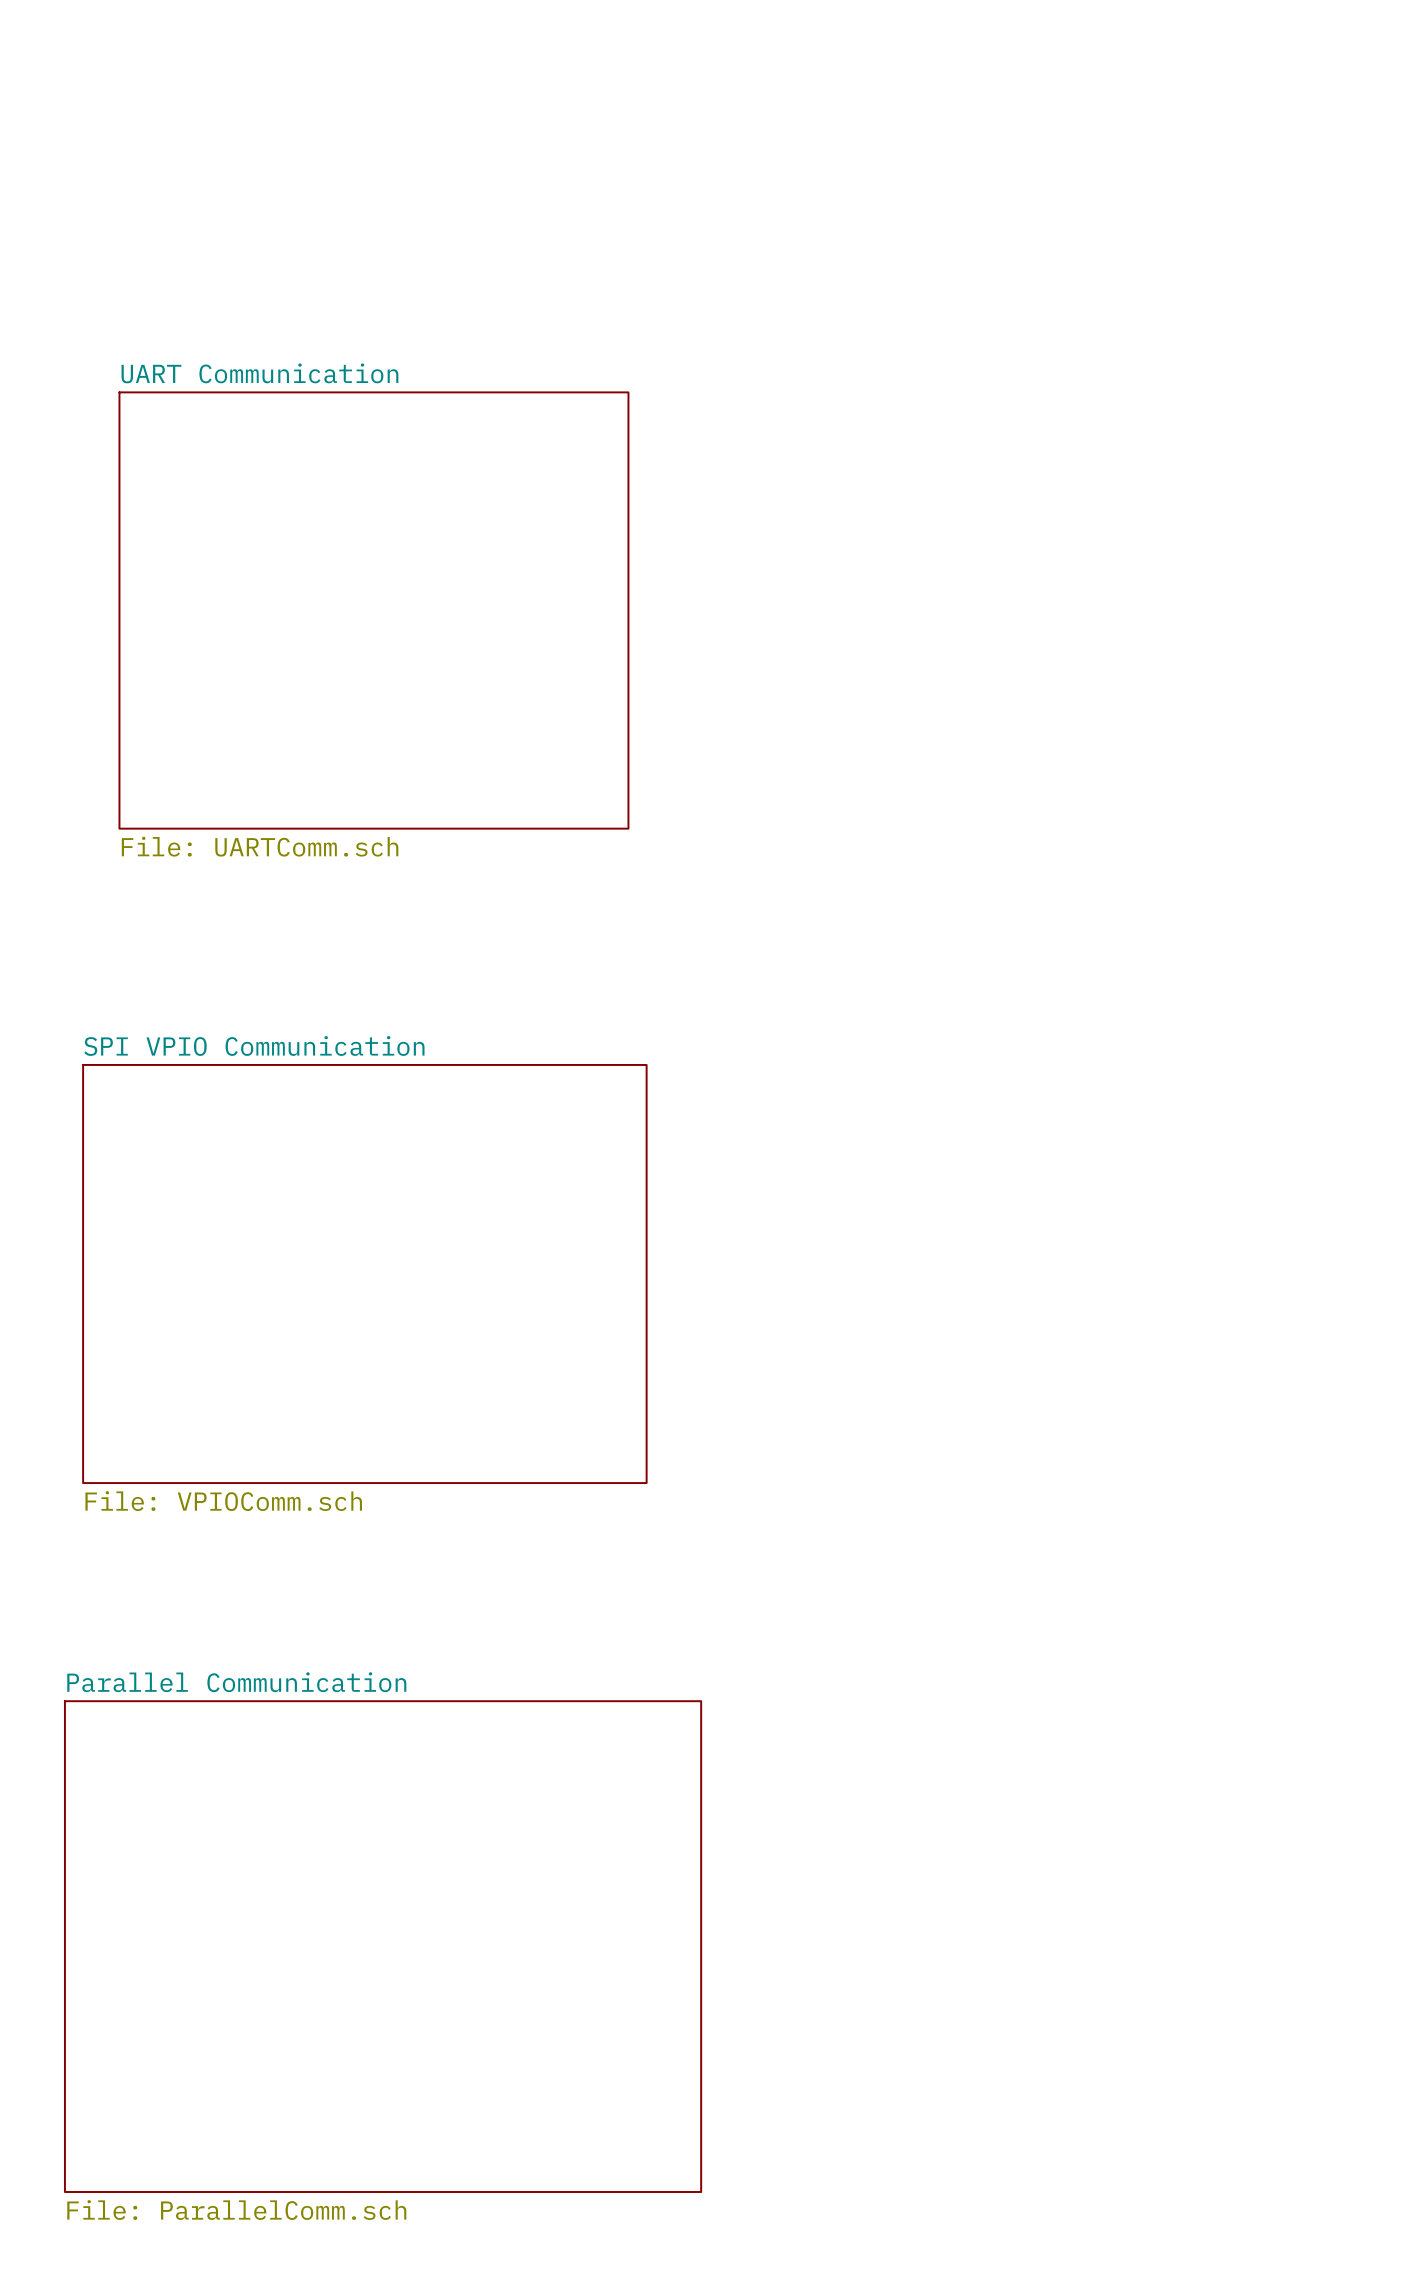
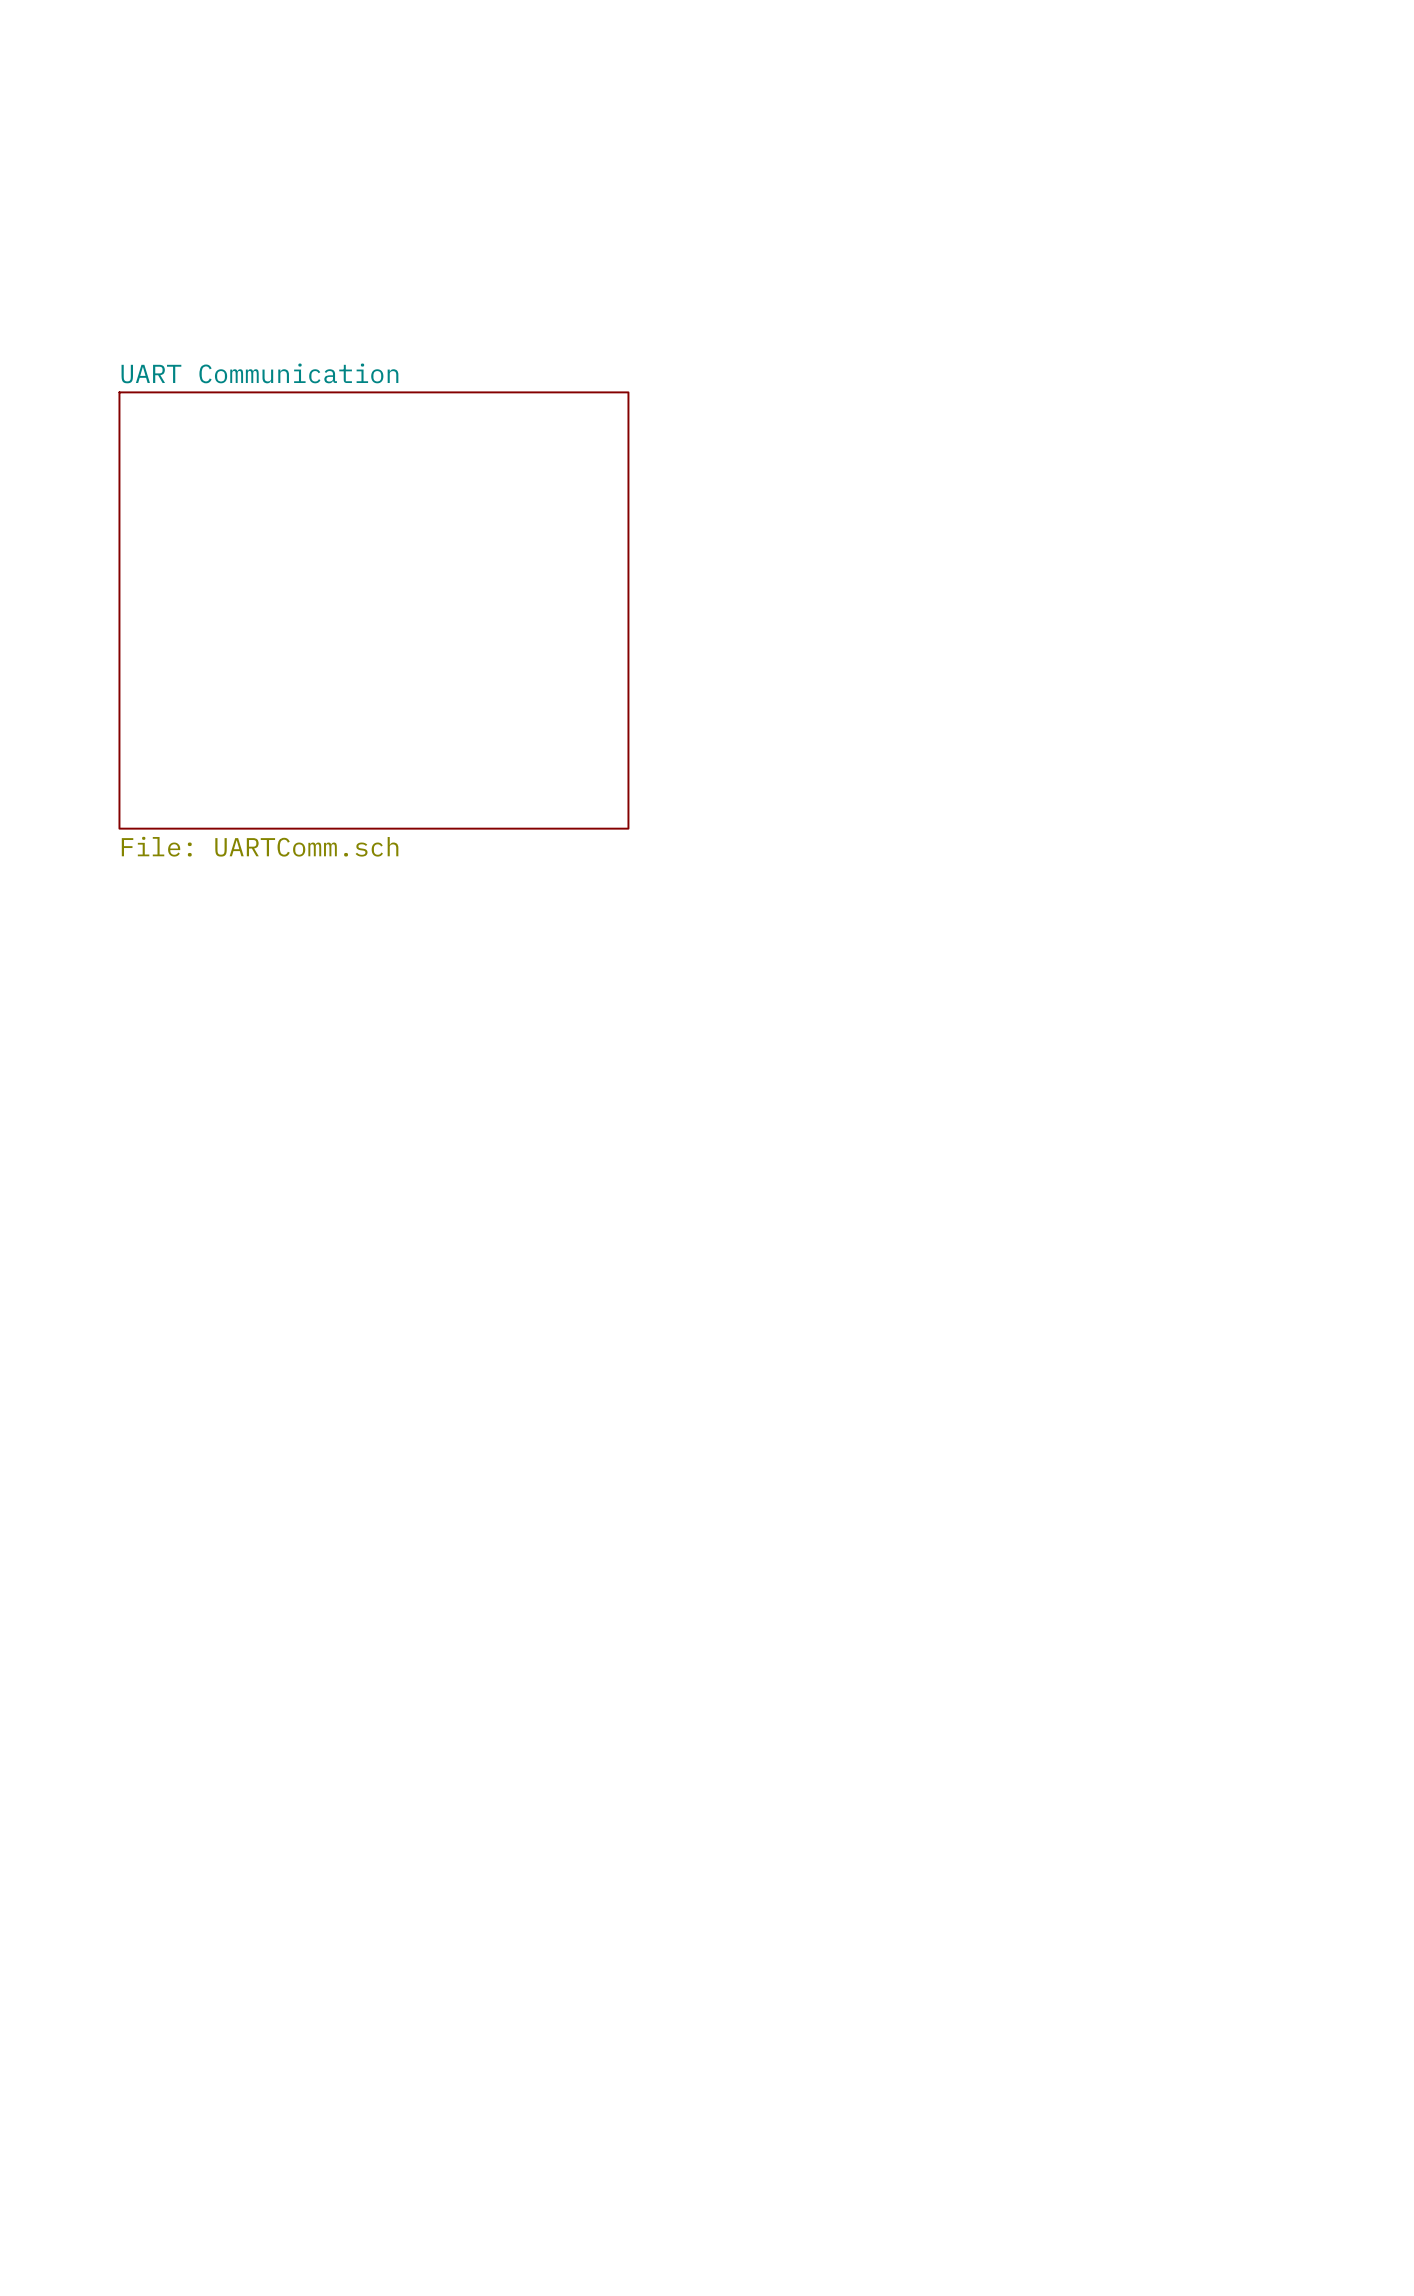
sheet SPI VPIO Communication: File: VPIOComm.sch (364, 1274) -> none
sheet Parallel Communication: File: ParallelComm.sch (383, 1946) -> none

